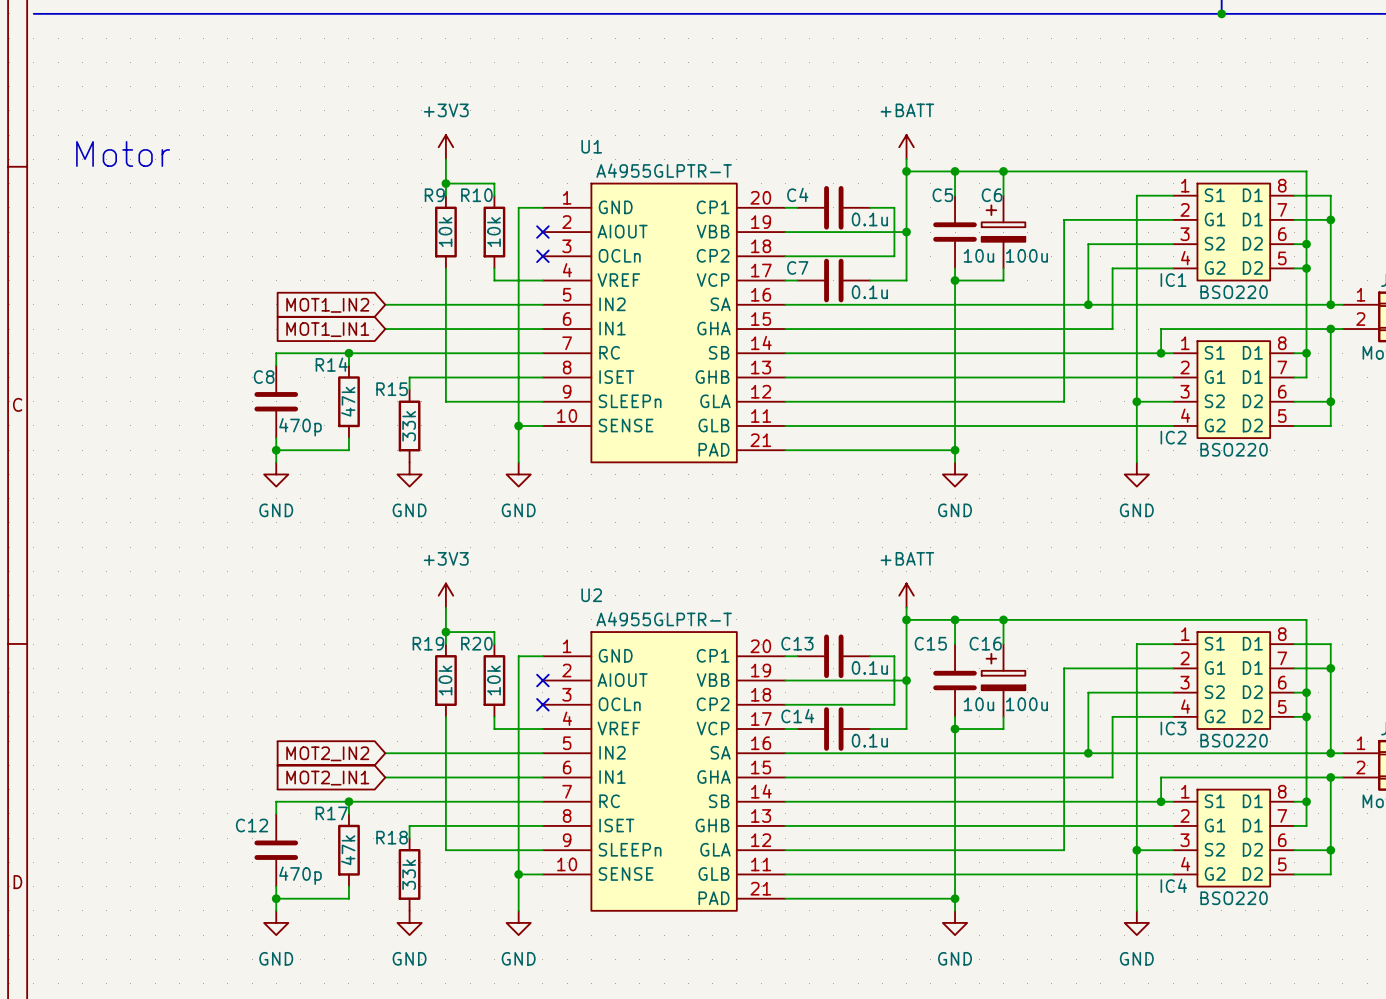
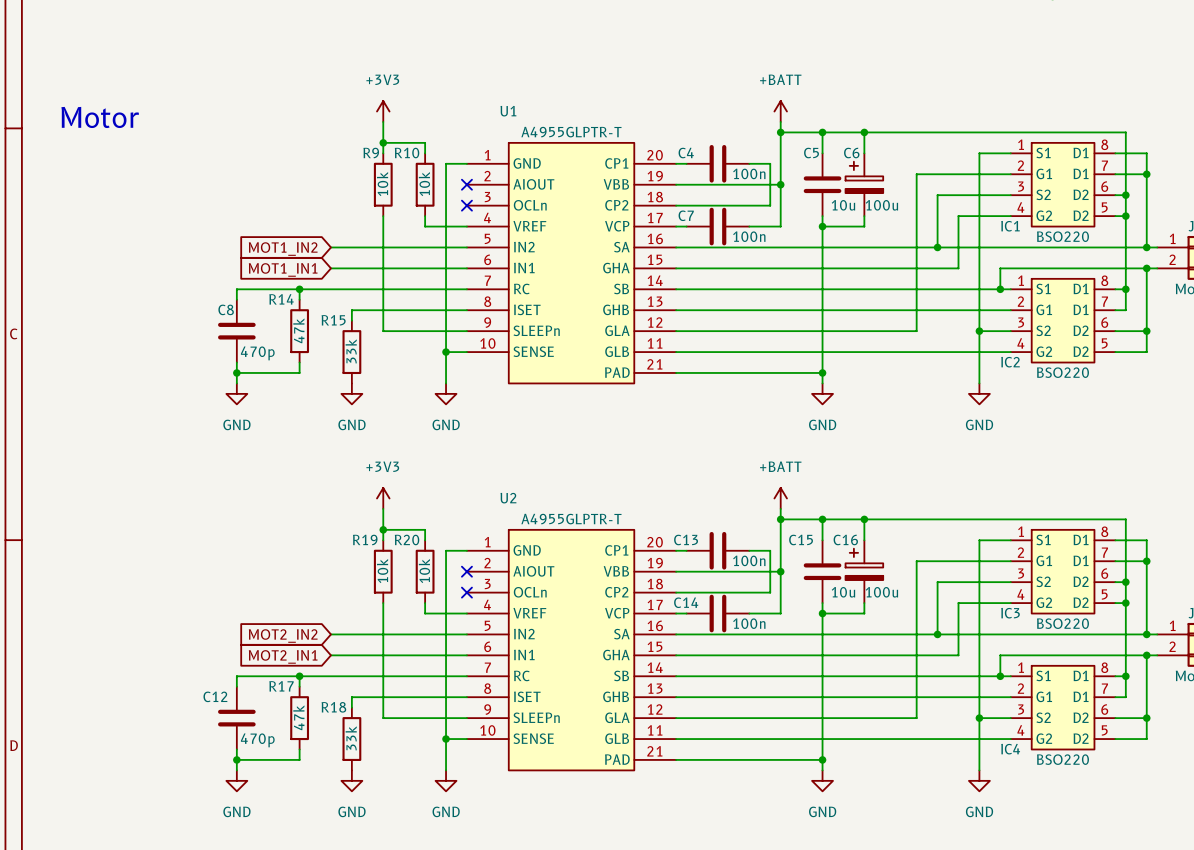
C4 value: 0.1u (869, 219) -> 100n (749, 173)
C7 value: 0.1u (869, 292) -> 100n (749, 236)
C13 value: 0.1u (869, 667) -> 100n (749, 560)
C14 value: 0.1u (869, 740) -> 100n (749, 623)

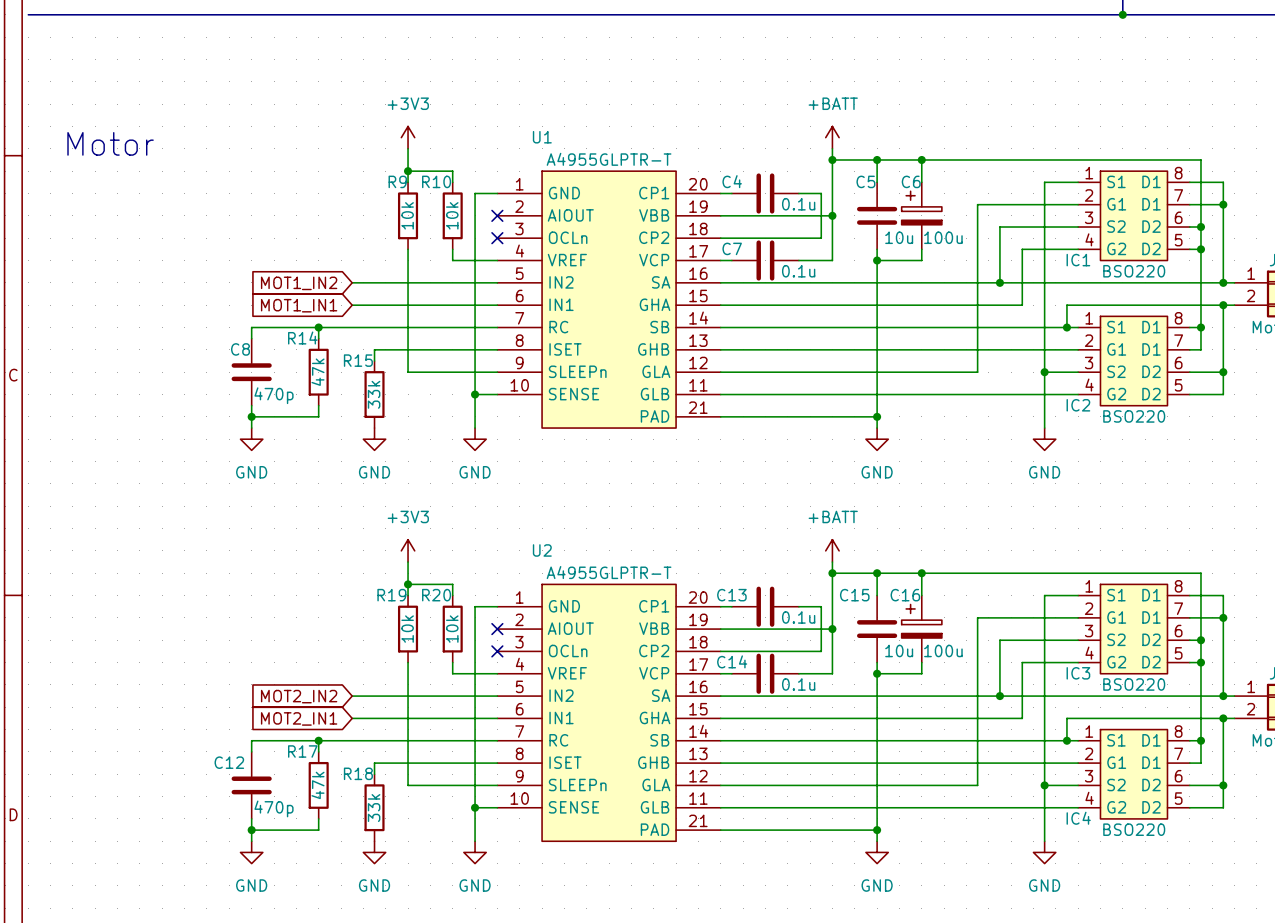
C4 value: 100n (749, 173) -> 0.1u (798, 204)
C7 value: 100n (749, 236) -> 0.1u (798, 271)
C13 value: 100n (749, 560) -> 0.1u (798, 617)
C14 value: 100n (749, 623) -> 0.1u (798, 684)

